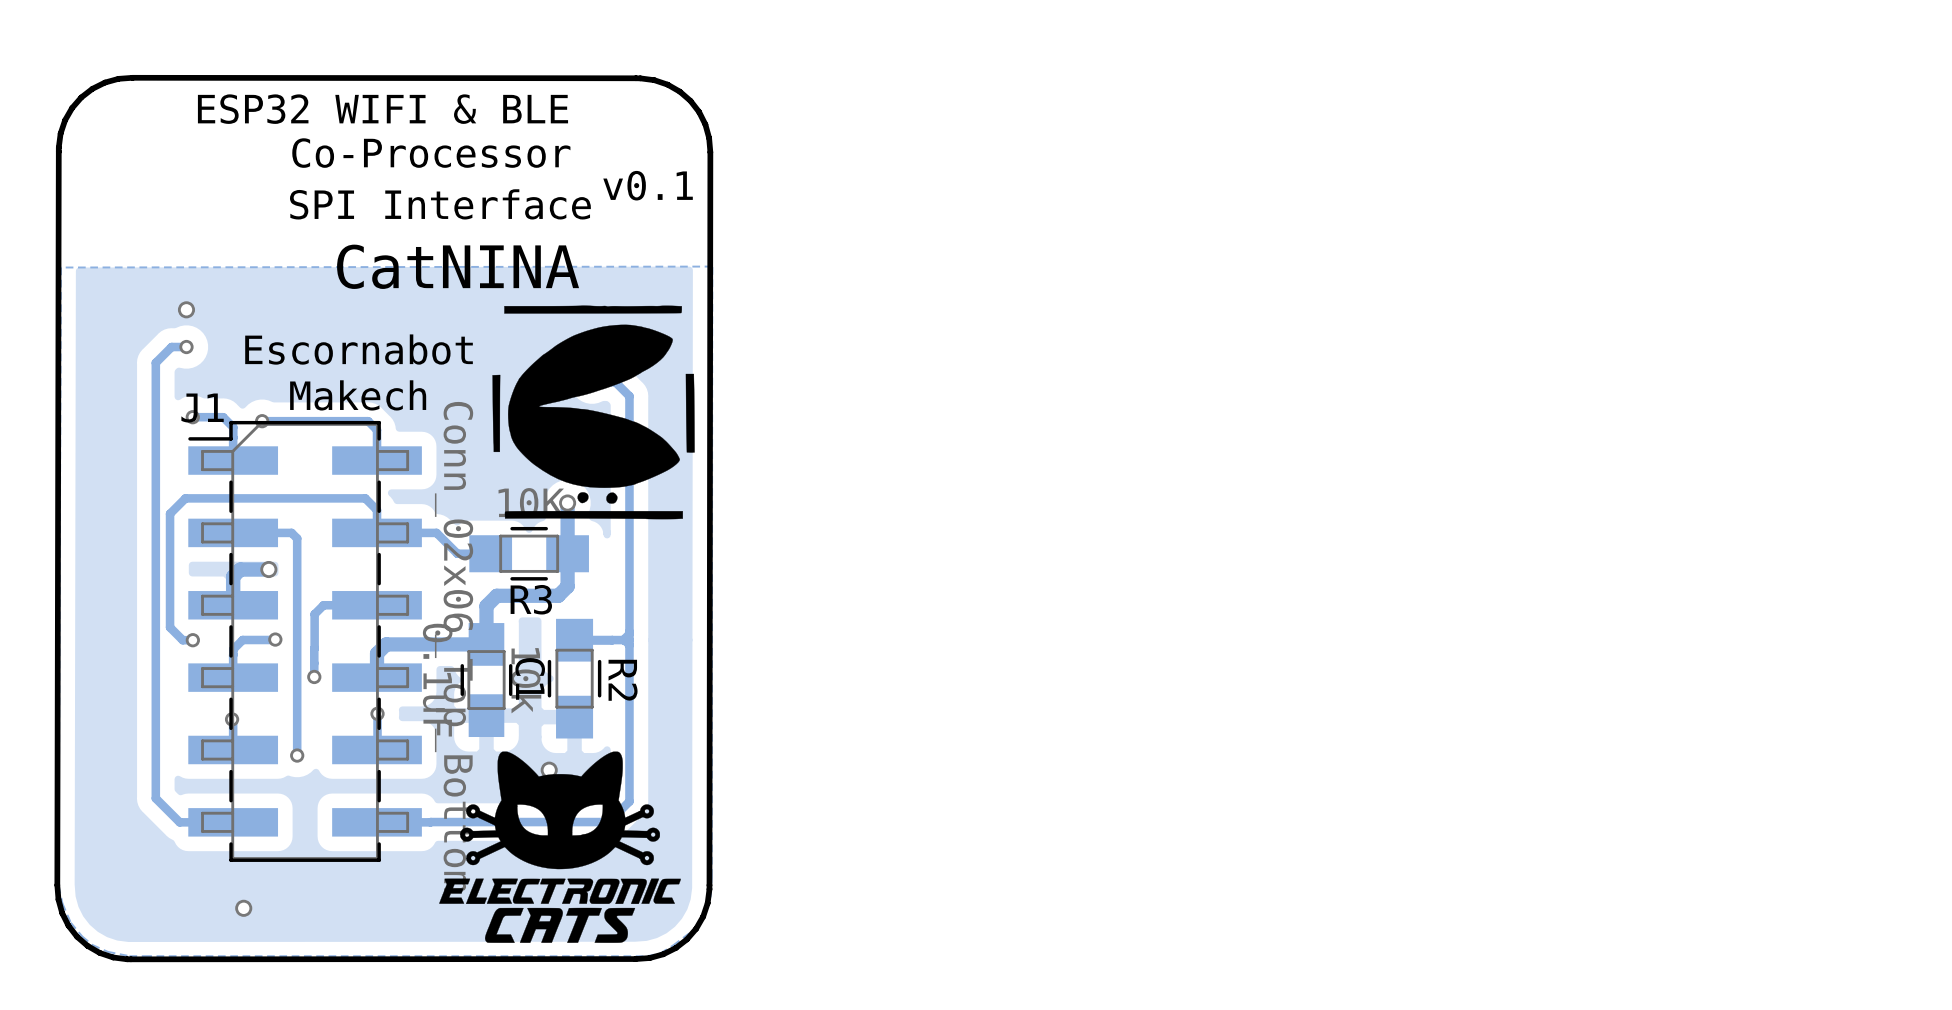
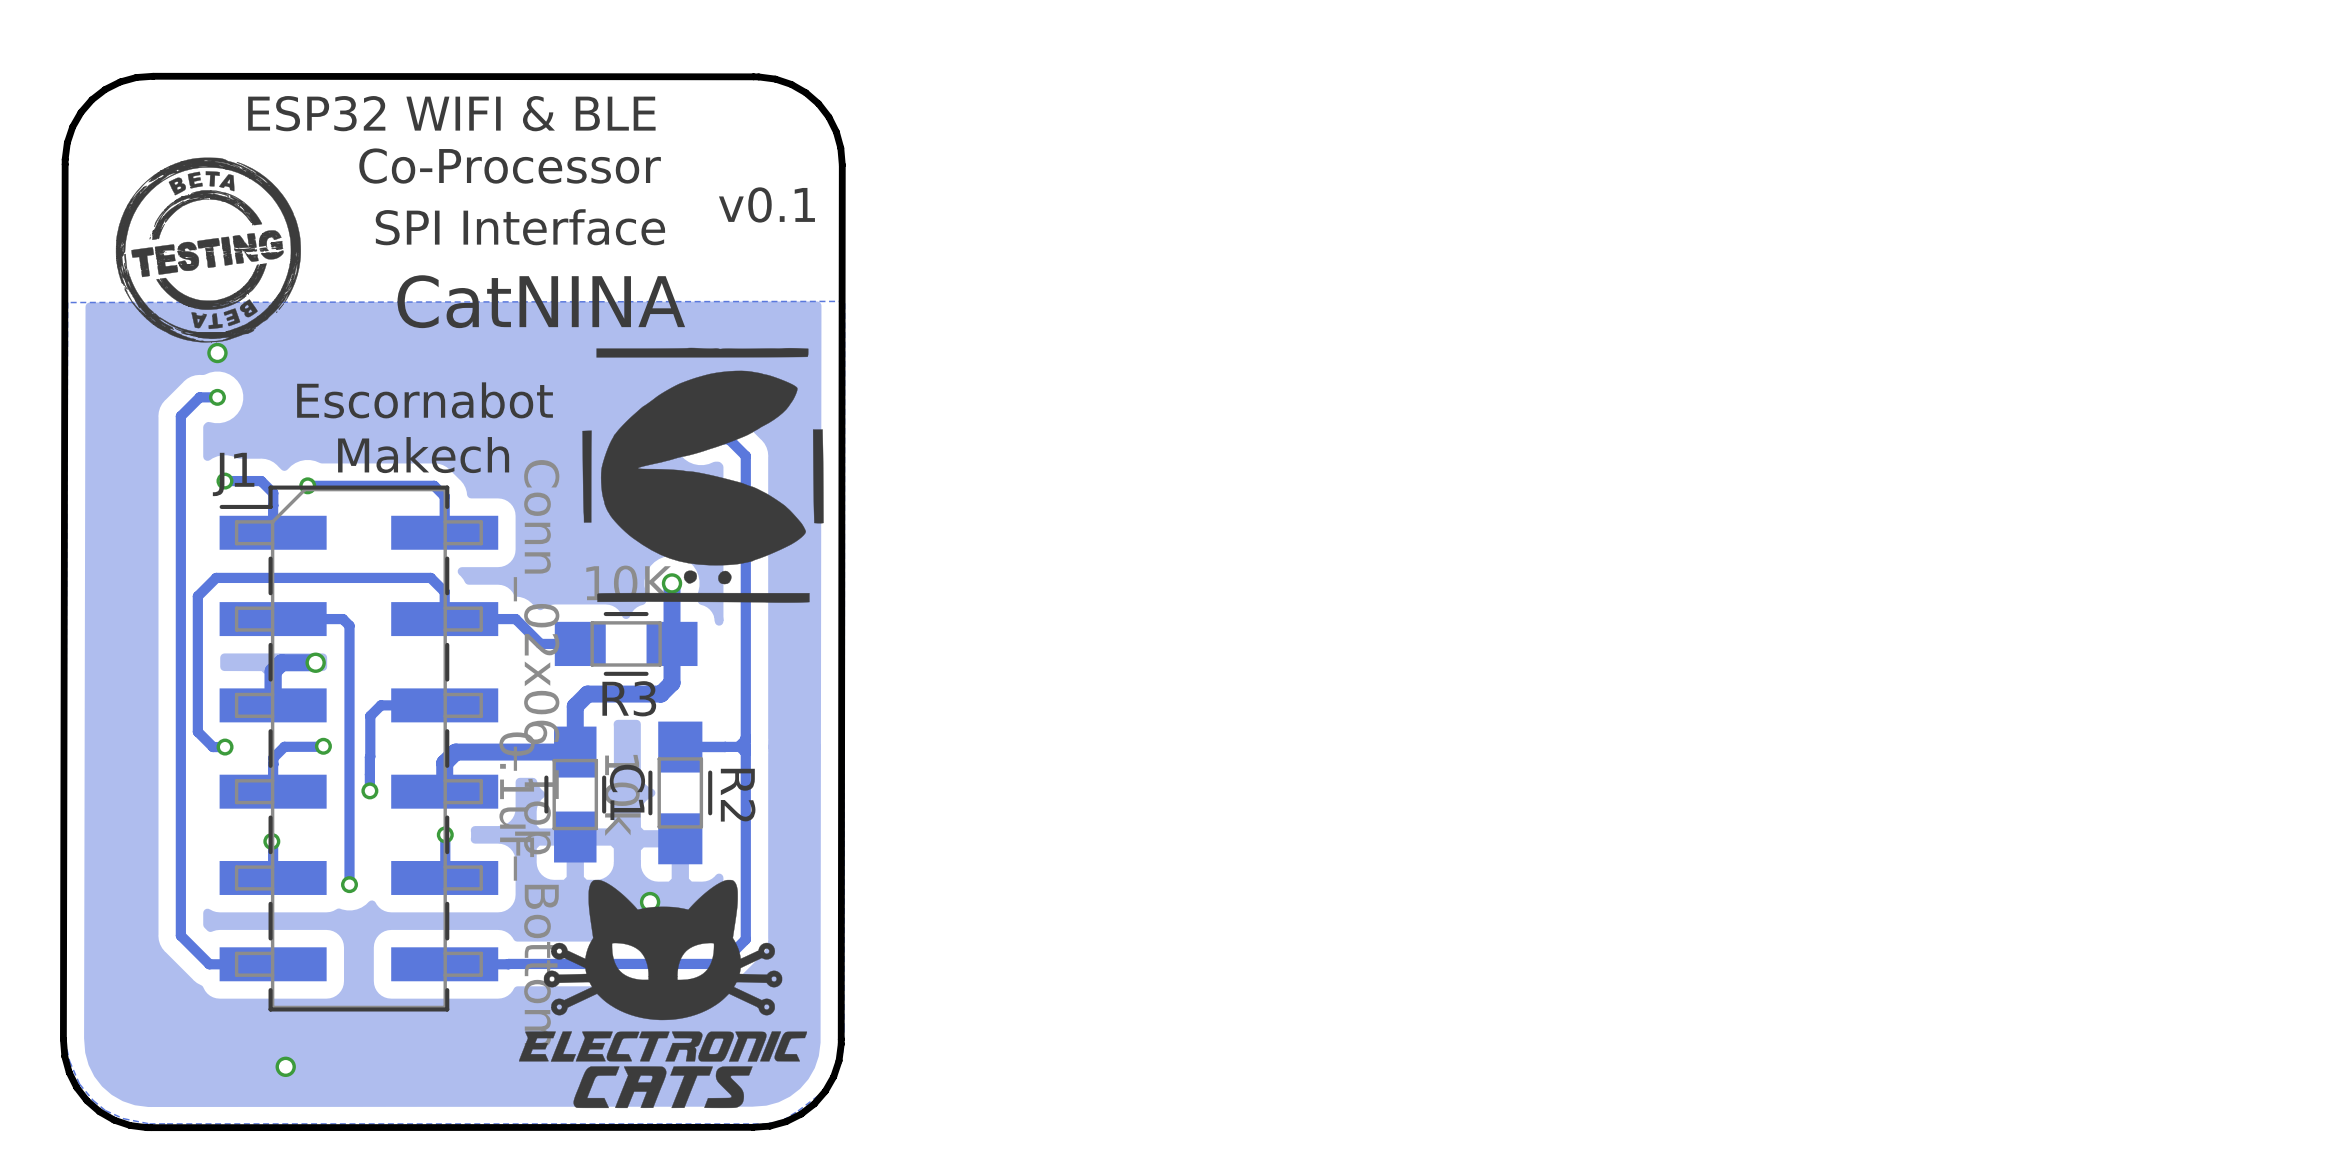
drawing: none -> [115, 157, 301, 343]

